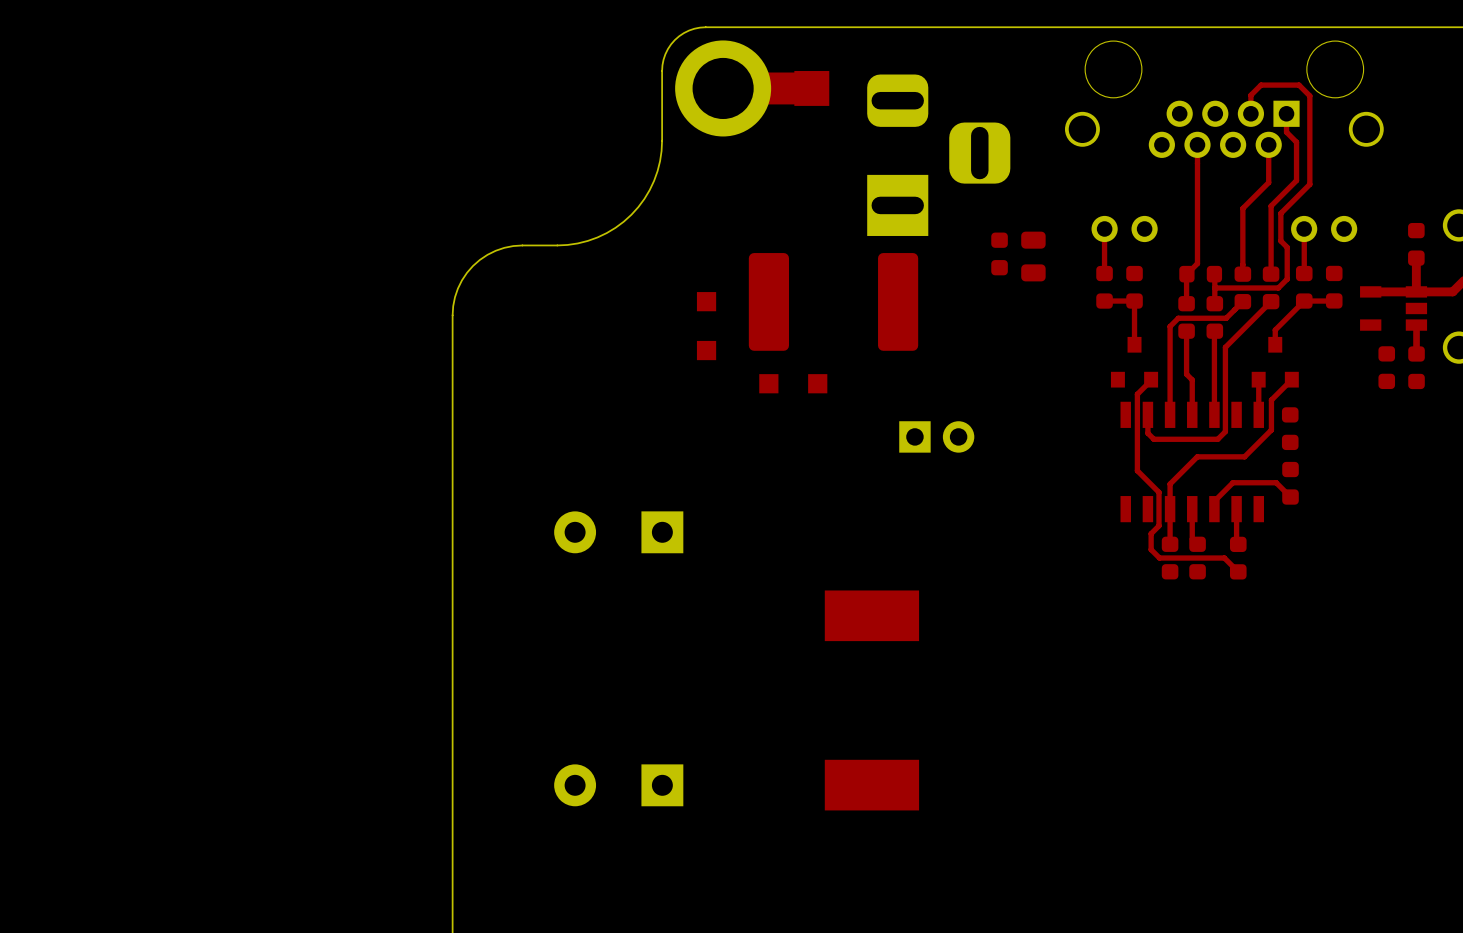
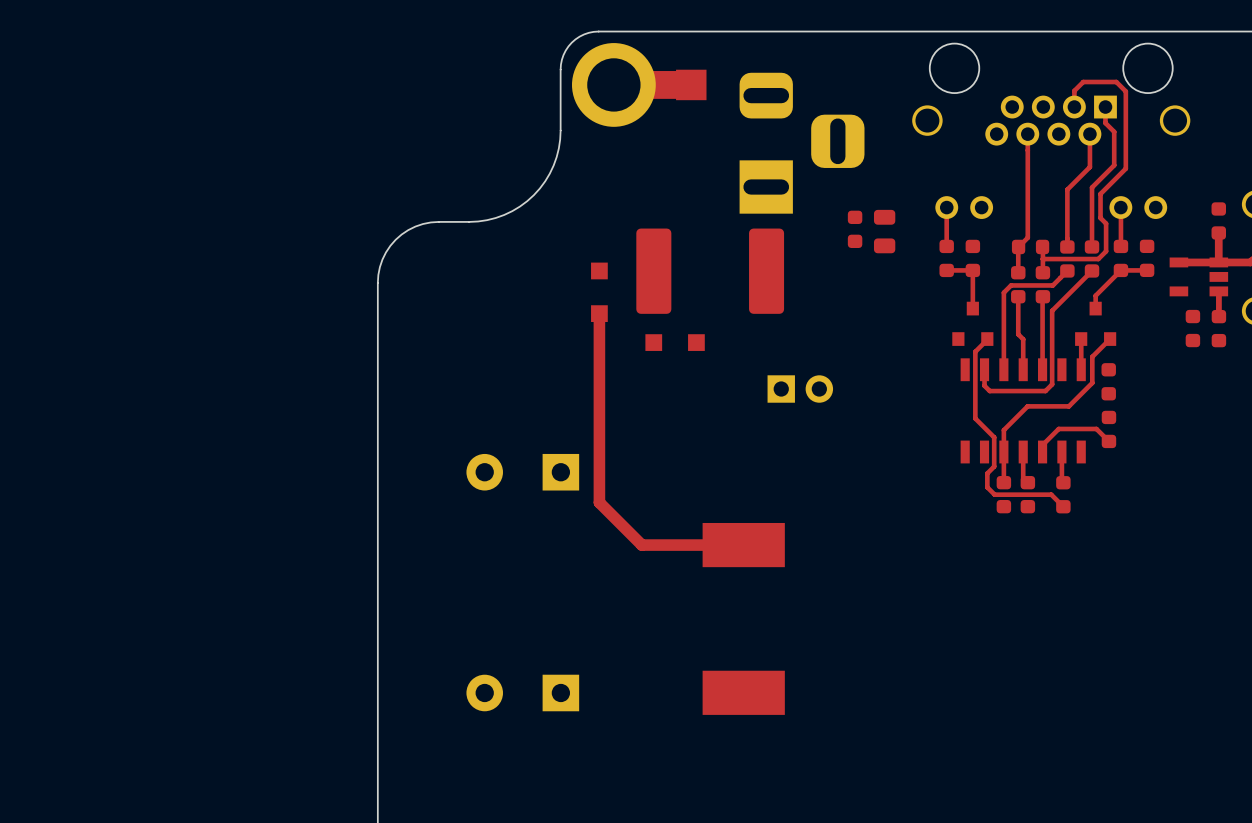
top track: none -> (599, 313) (599, 502) (641, 545) (743, 545)

